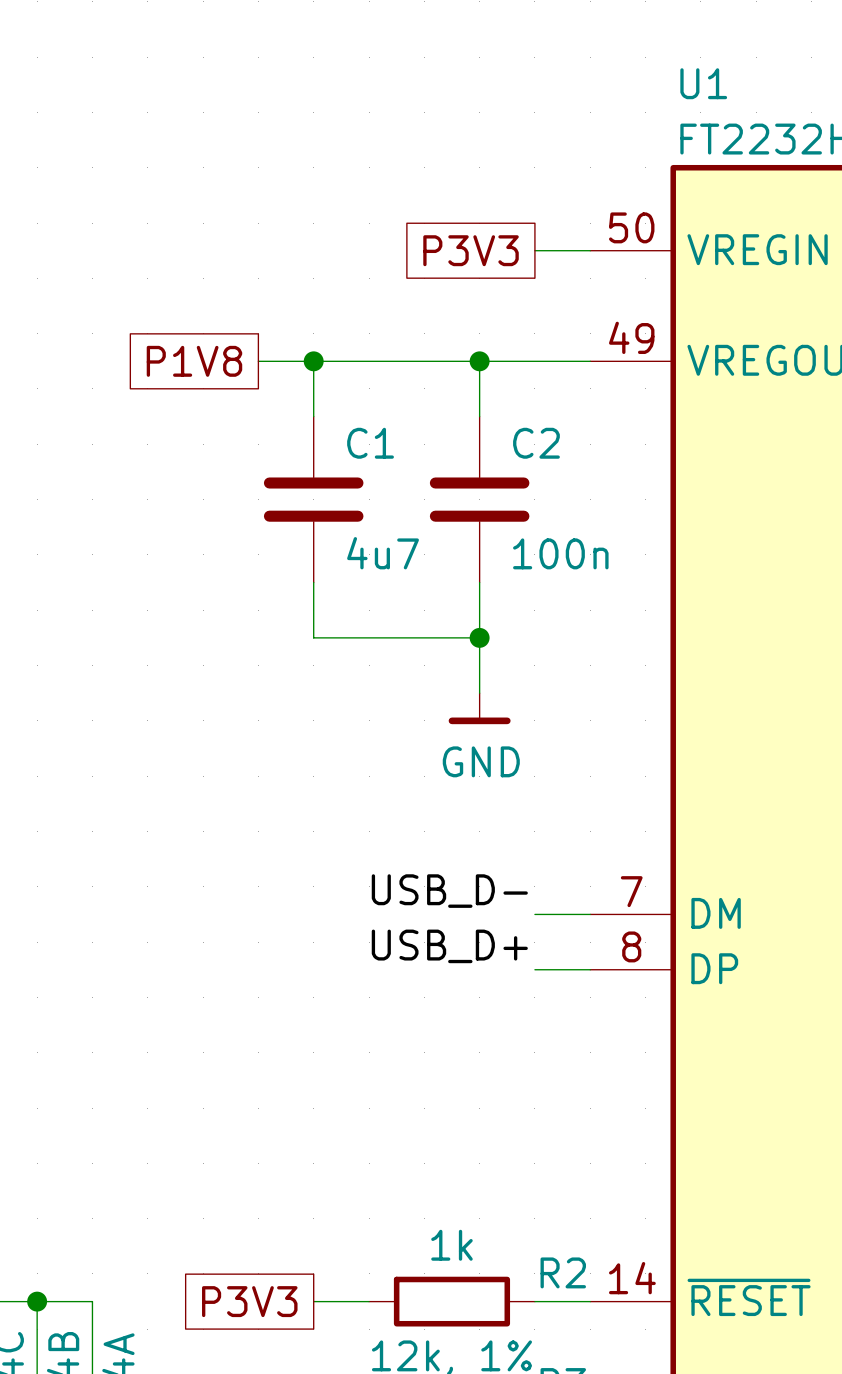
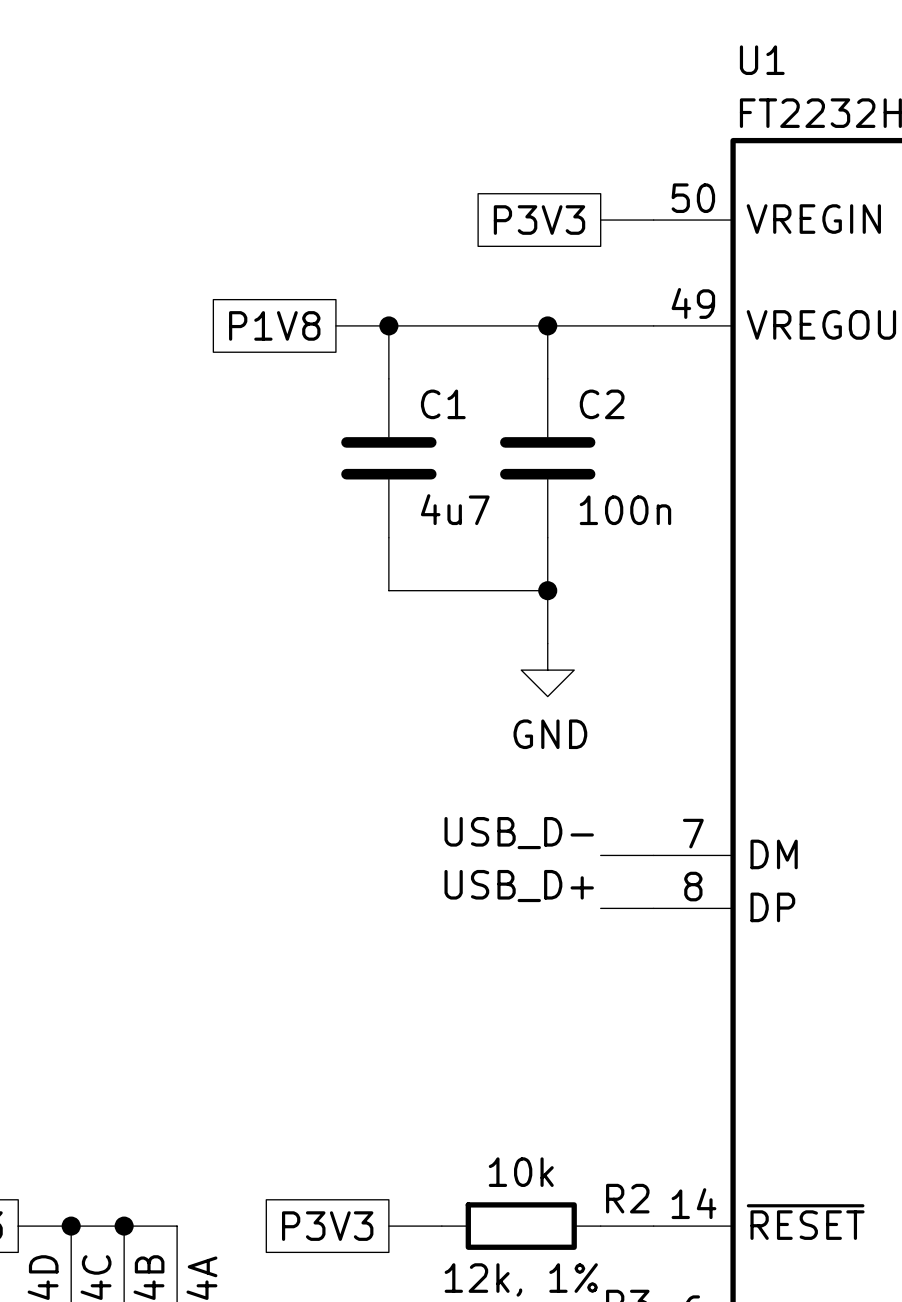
power symbol shape: [448, 693, 511, 725] -> [521, 643, 575, 697]
R2 value: 1k (451, 1245) -> 10k (521, 1172)

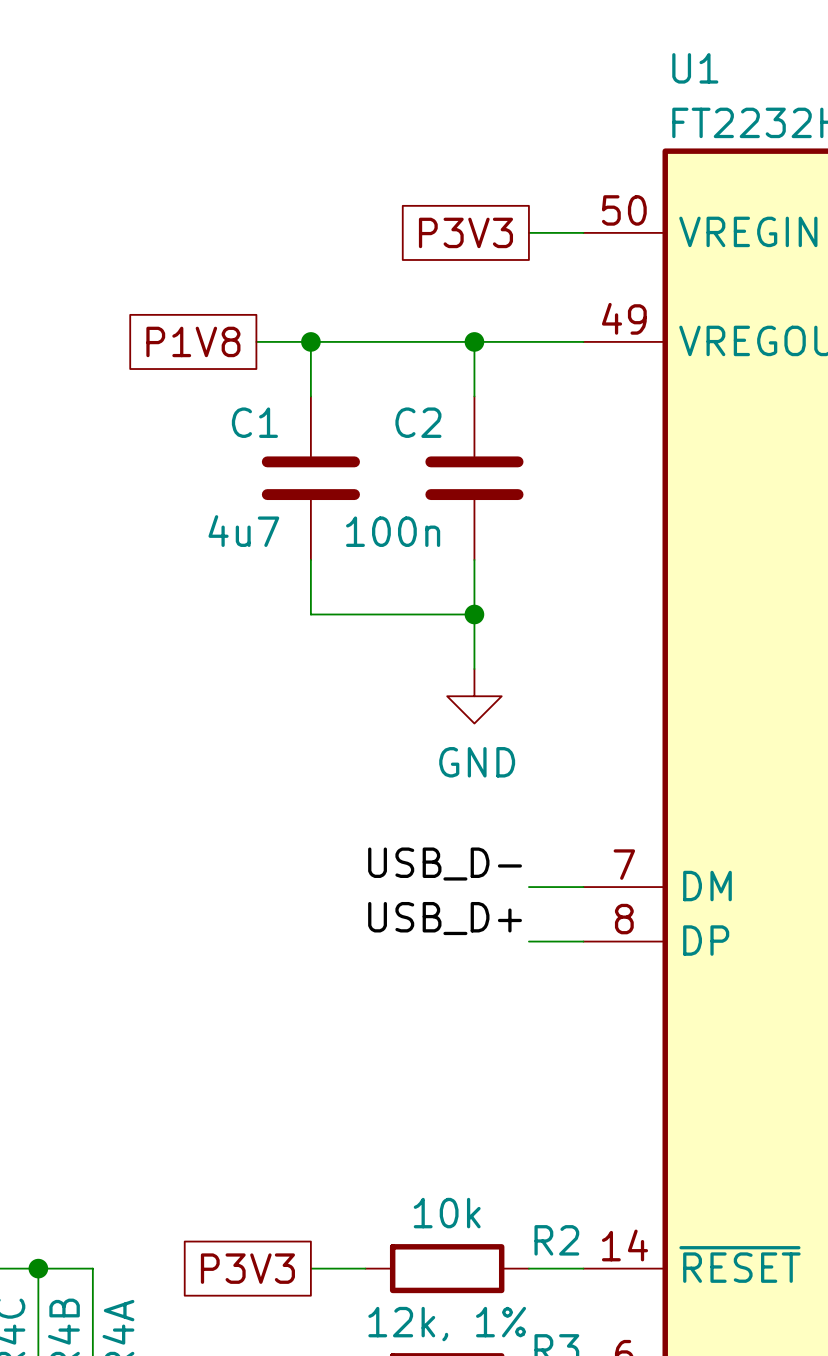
C1 name position: C1 (443, 404) -> C1 (254, 422)
C2 name position: C2 (602, 404) -> C2 (418, 422)
C1 value position: 4u7 (455, 509) -> 4u7 (243, 531)
C2 value position: 100n (625, 510) -> 100n (393, 531)

